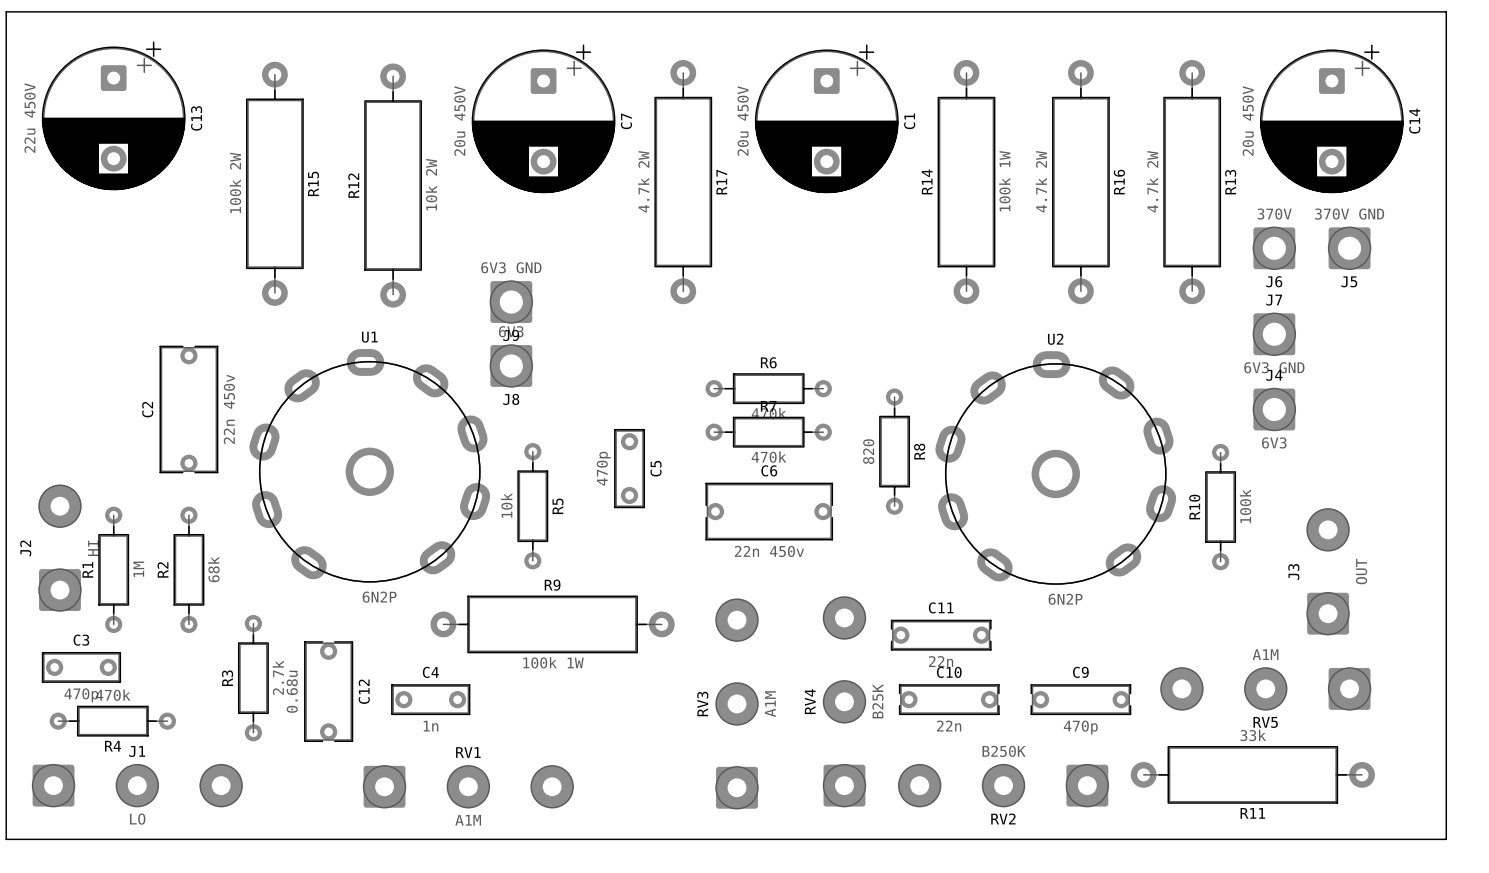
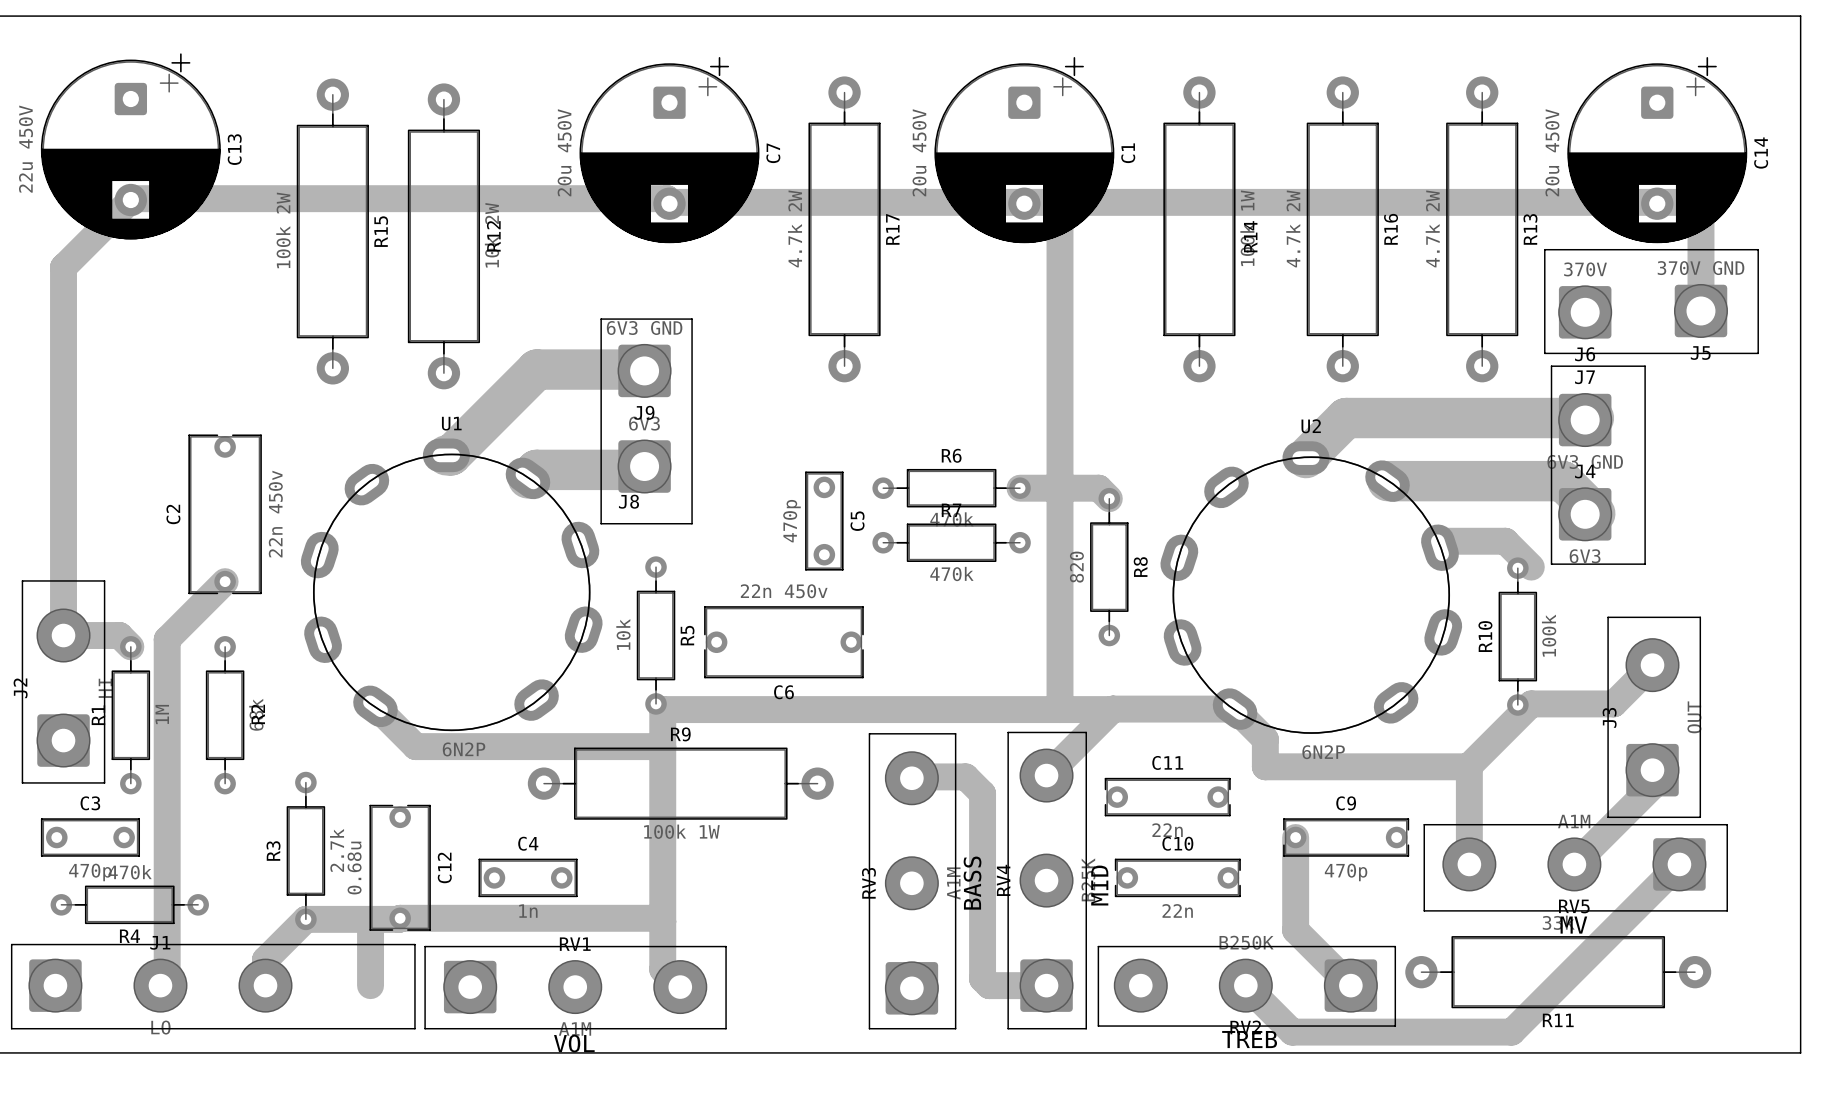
track: none -> (1061, 202) (1060, 709)
R14 name position: R14 (927, 181) -> R14 (1250, 236)
R12 name position: R12 (353, 185) -> R12 (493, 236)
R12 position: (393, 185) -> (443, 236)
line: none -> (1544, 249) (1758, 249) (1758, 353) (1544, 353) (1544, 249)
track: none -> (1700, 310) (1700, 213) (1690, 202) (670, 202) (667, 198) (132, 198) (63, 267) (63, 635) (119, 635) (130, 646)
J5 position: (1349, 248) -> (1700, 310)
line: none -> (601, 319) (692, 319) (692, 523) (601, 523) (601, 319)
line: none -> (1551, 366) (1645, 366) (1645, 564) (1551, 564) (1551, 366)
track: none -> (644, 370) (536, 369) (451, 455) (446, 455)
J9 position: (511, 302) -> (644, 370)
track: none -> (1593, 418) (1346, 418) (1305, 458)
U1 footprint: [249, 349, 491, 583] -> [300, 438, 603, 732]
U2 footprint: [935, 351, 1177, 585] -> [1160, 441, 1463, 734]
J8 position: (511, 365) -> (644, 466)
track: none -> (644, 466) (641, 469) (536, 469) (527, 478)
track: none -> (1387, 481) (1562, 481) (1595, 513)
track: none -> (1020, 488) (1098, 488) (1109, 498)
track: none -> (1439, 547) (1446, 541) (1505, 541) (1531, 567)
line: none -> (22, 580) (104, 580) (104, 782) (22, 782) (22, 580)
track: none -> (225, 581) (167, 639) (167, 978) (160, 985)
C5 position: (629, 468) -> (824, 521)
C6 name position: C6 (769, 470) -> C6 (783, 692)
line: none -> (1608, 617) (1700, 617) (1700, 817) (1608, 817) (1608, 617)
C6 position: (769, 511) -> (783, 642)
track: none -> (1652, 665) (1613, 703) (1531, 703) (1468, 766)
C6 value position: 22n 450v (769, 551) -> 22n 450v (784, 591)
track: none -> (375, 706) (415, 746) (662, 746)
track: none -> (1112, 709) (662, 709) (662, 969) (680, 987)
R2 name position: R2 (162, 569) -> R2 (258, 714)
line: none -> (1008, 732) (1086, 732) (1086, 1028) (1008, 1028) (1008, 732)
line: none -> (869, 733) (955, 733) (955, 1028) (869, 1028) (869, 733)
track: none -> (1468, 766) (1469, 864)
track: none -> (1468, 766) (1265, 766) (1265, 739) (1235, 709) (1113, 709) (1046, 775)
track: none -> (1652, 770) (1652, 786) (1574, 864)
track: none -> (911, 778) (965, 776) (982, 793) (982, 978) (989, 985) (1046, 985)
line: none -> (1424, 824) (1727, 824) (1727, 910) (1424, 910) (1424, 824)
track: none -> (1295, 837) (1295, 930) (1350, 985)
track: none -> (1679, 864) (1511, 1032) (1292, 1032) (1245, 985)
C9 position: (1080, 699) -> (1346, 837)
RV3 text: none -> BASS (972, 883)
RV4 text: none -> MID (1099, 885)
track: none -> (369, 919) (370, 985)
track: none -> (662, 921) (659, 918) (305, 919) (265, 959) (265, 985)
RV5 text: none -> MV (1573, 925)
line: none -> (11, 944) (414, 944) (414, 1028) (11, 1028) (11, 944)
line: none -> (425, 946) (726, 946) (726, 1028) (425, 1028) (425, 946)
line: none -> (1098, 946) (1395, 946) (1395, 1026) (1098, 1026) (1098, 946)
RV2 text: none -> TREB (1249, 1039)
RV1 text: none -> VOL (574, 1043)

